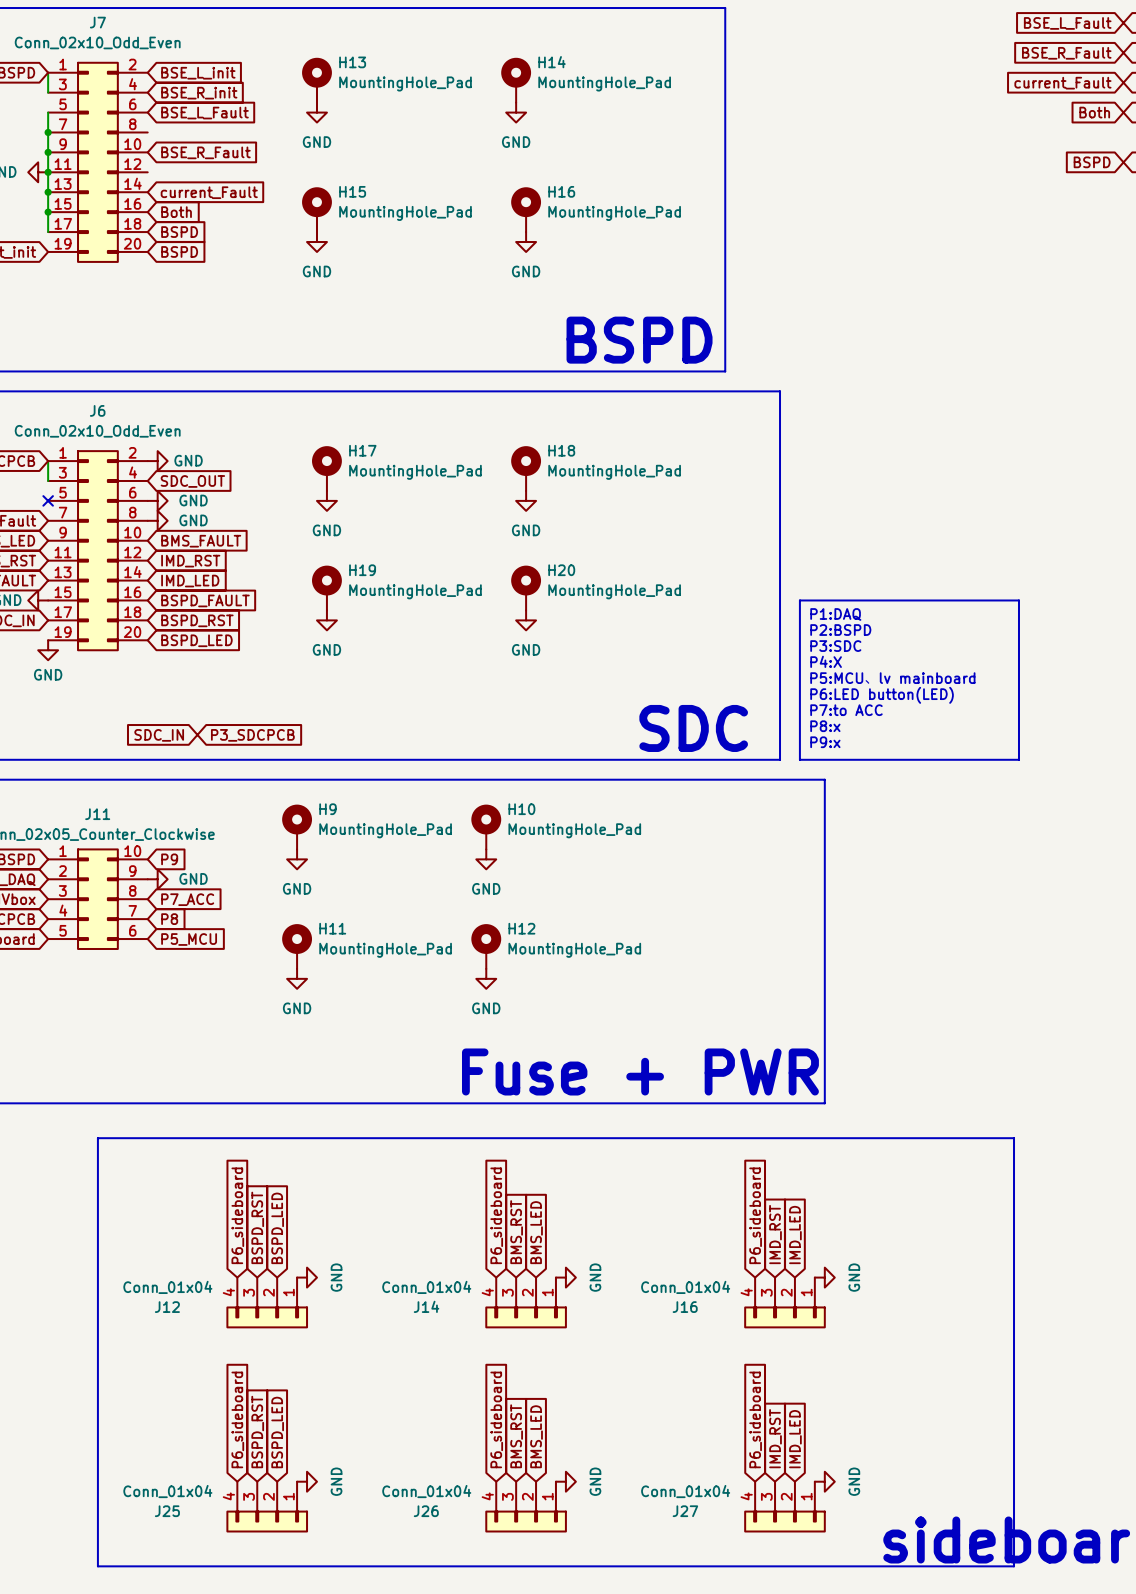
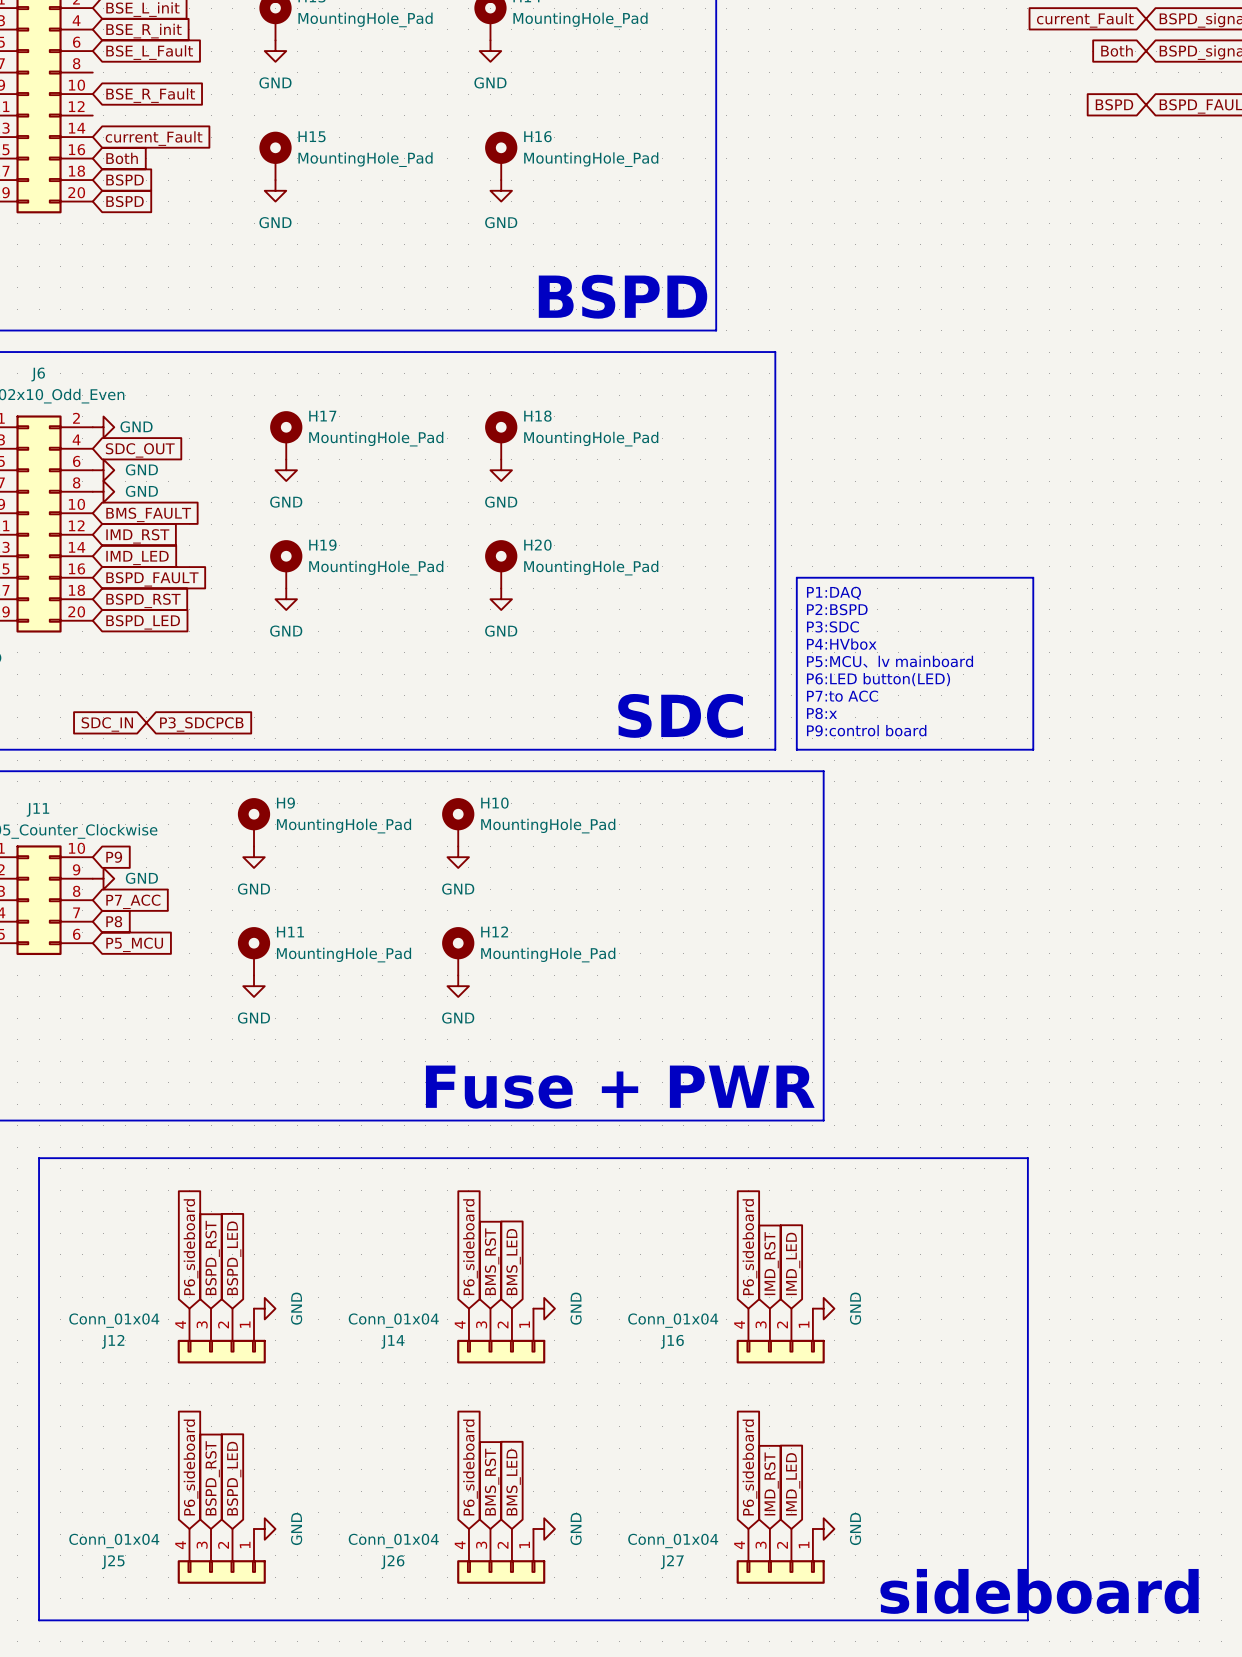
text: P4:X (826, 661) -> P4:HVbox (841, 644)
text: P9:x (825, 742) -> P9:control board (866, 730)

